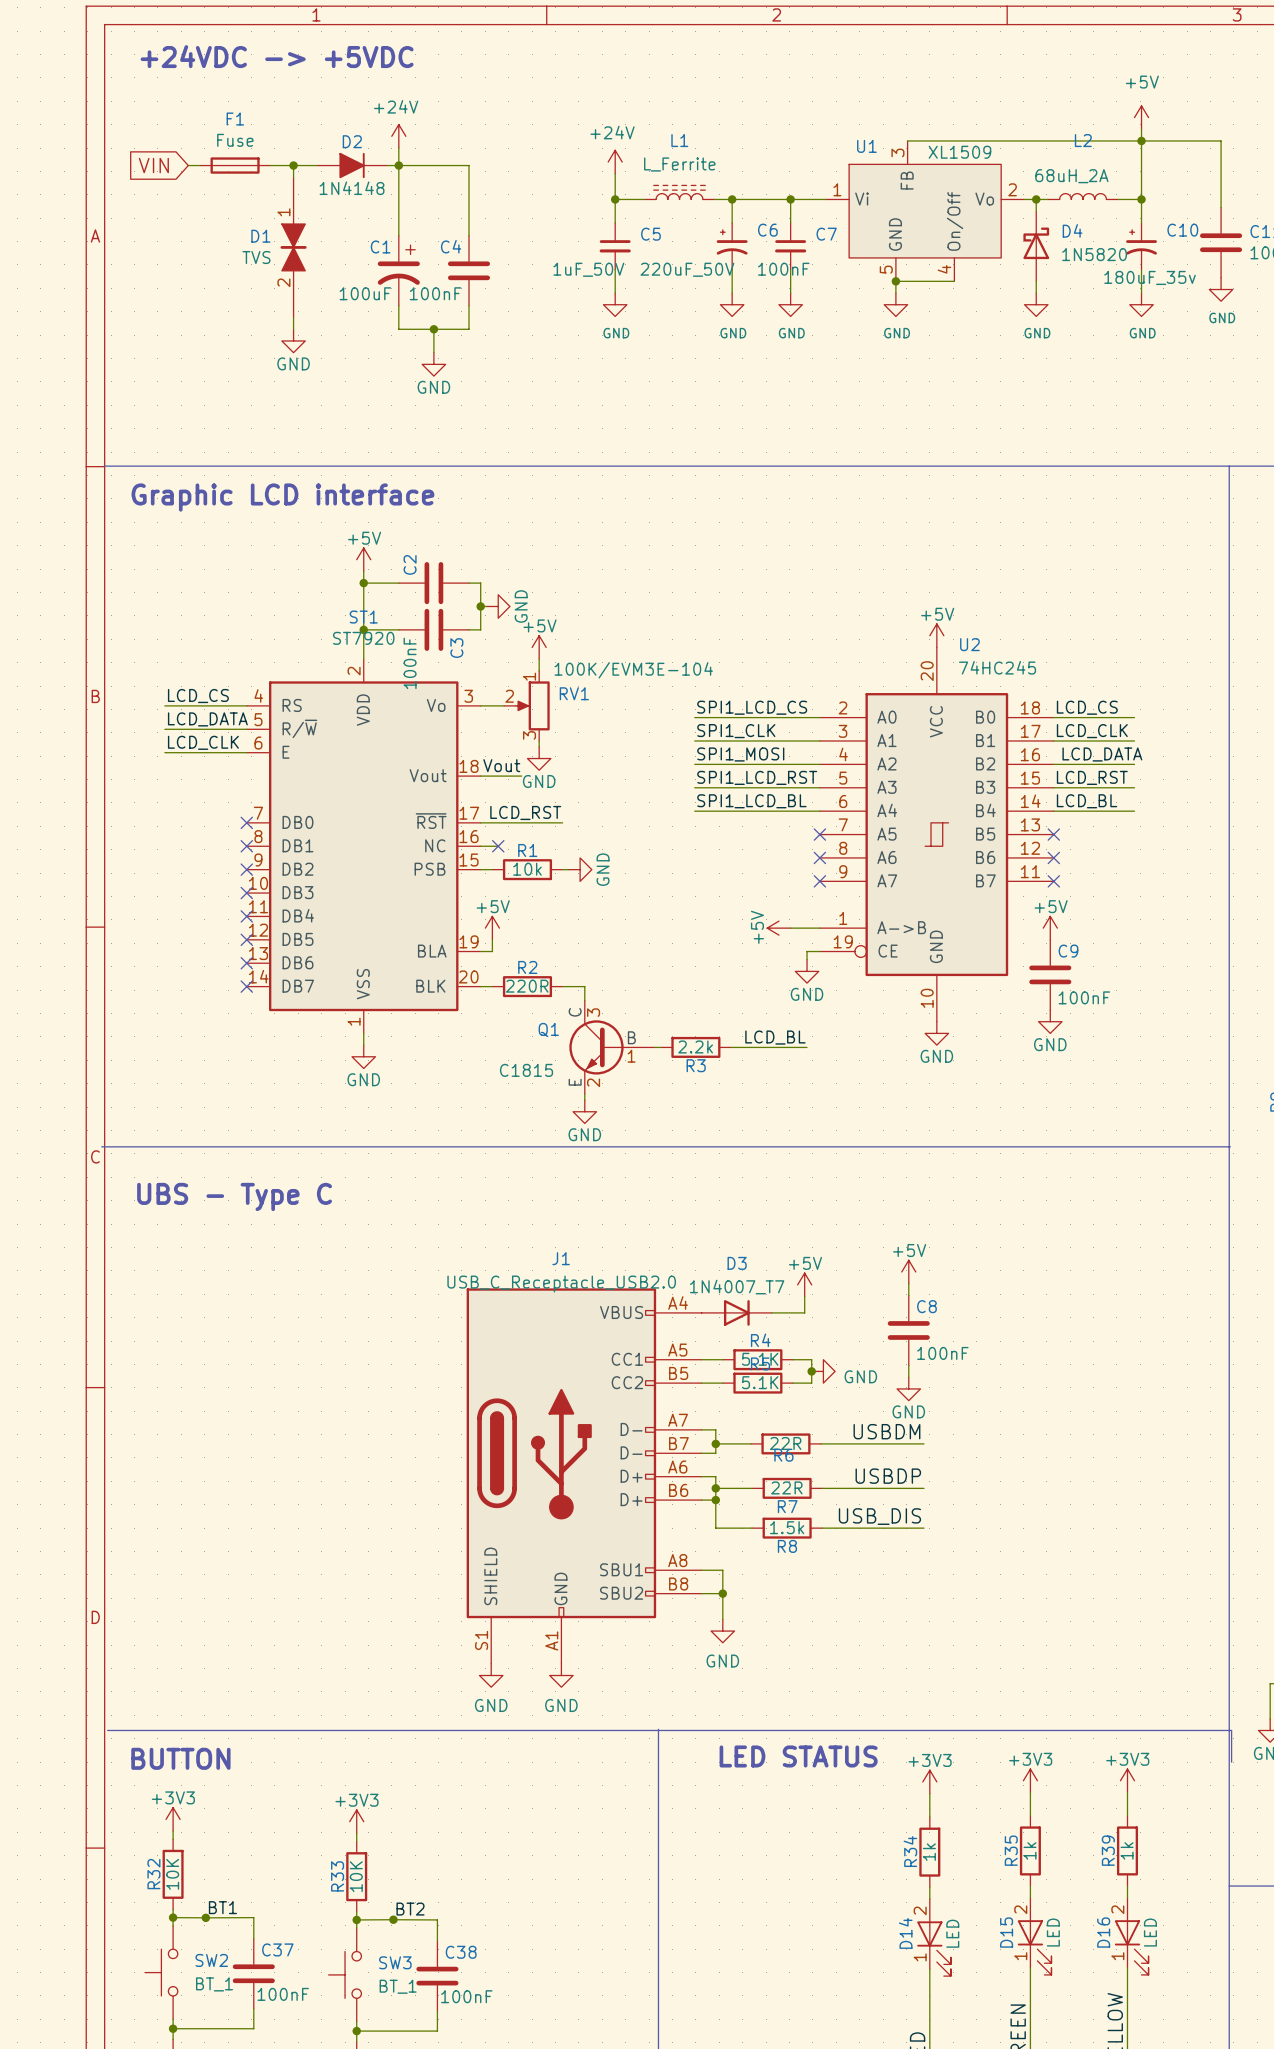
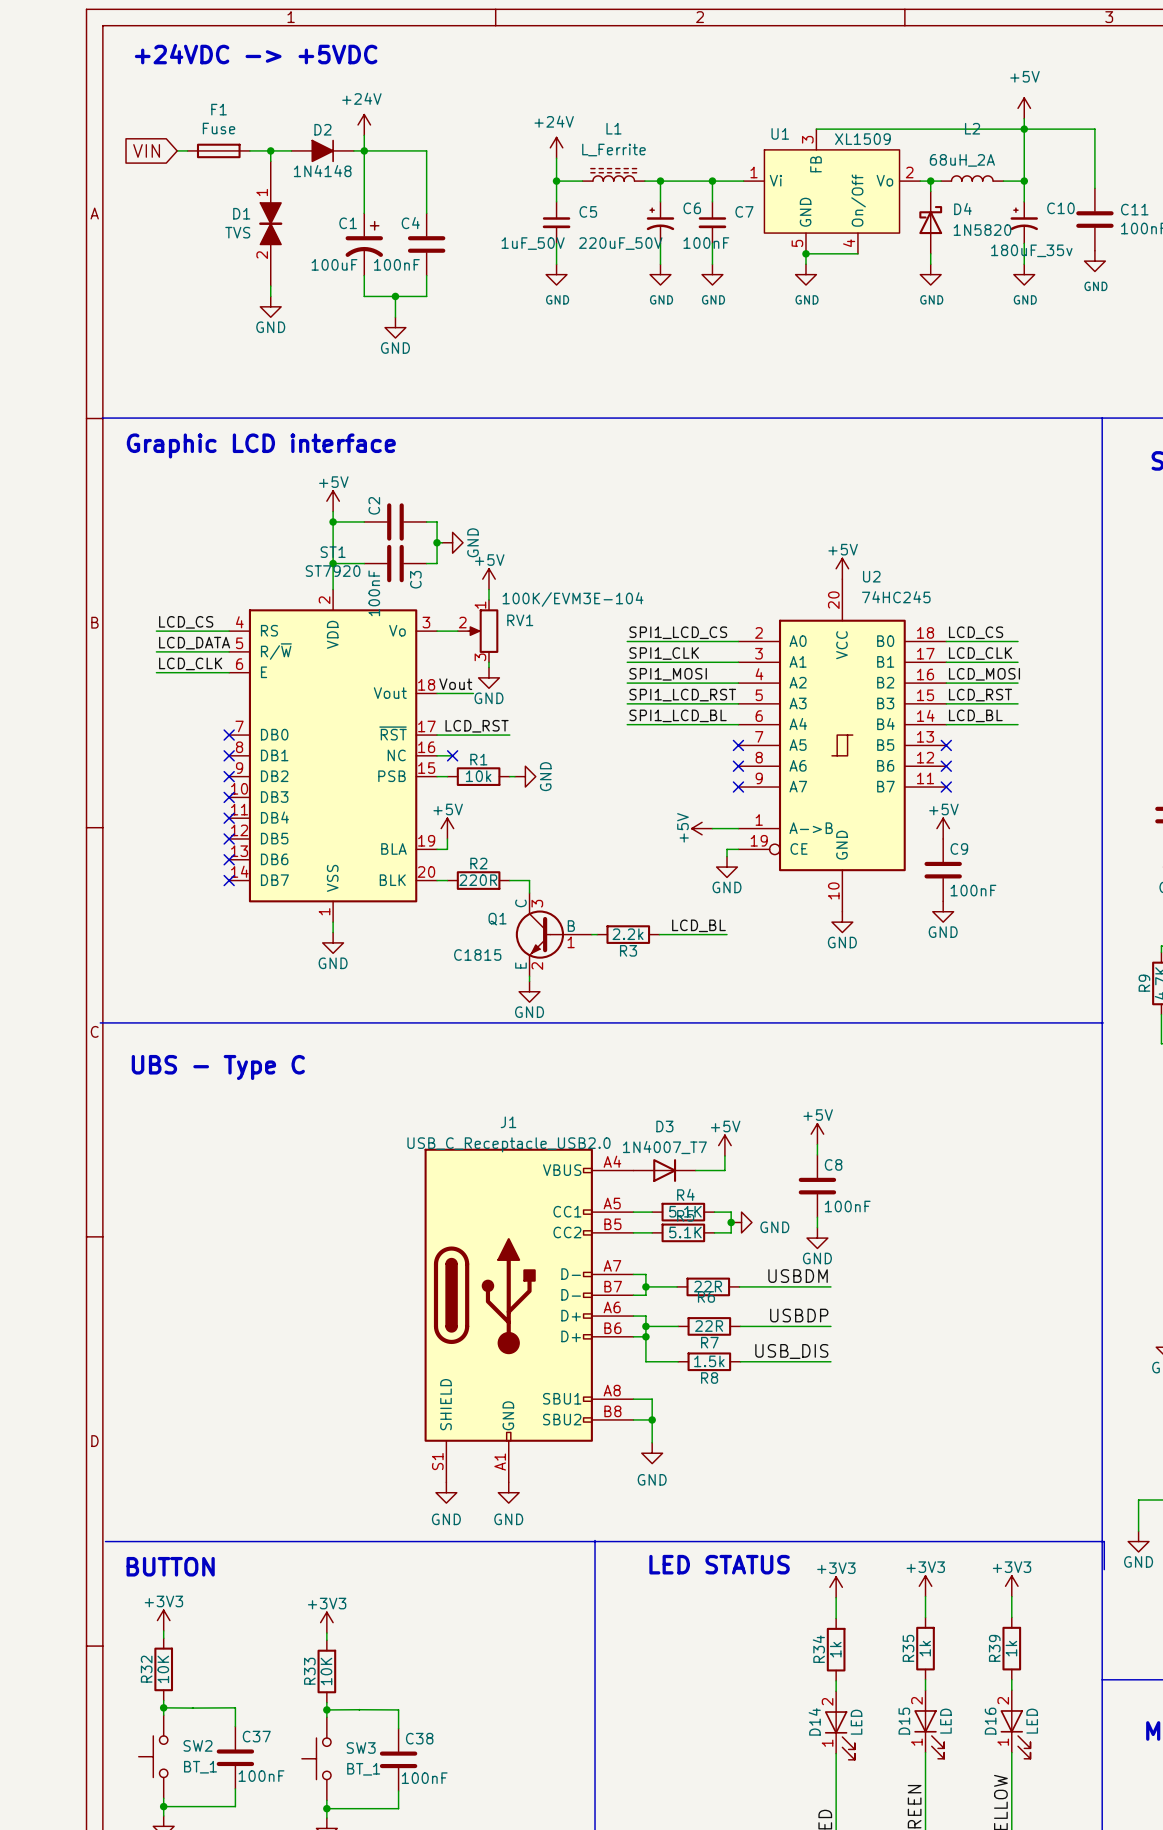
label: LCD_DATA (1102, 754) -> LCD_MOSI (984, 674)
label: BT1 (222, 1907) -> none
label: BT2 (410, 1909) -> none
junction: (205, 1917) -> none
junction: (393, 1919) -> none

